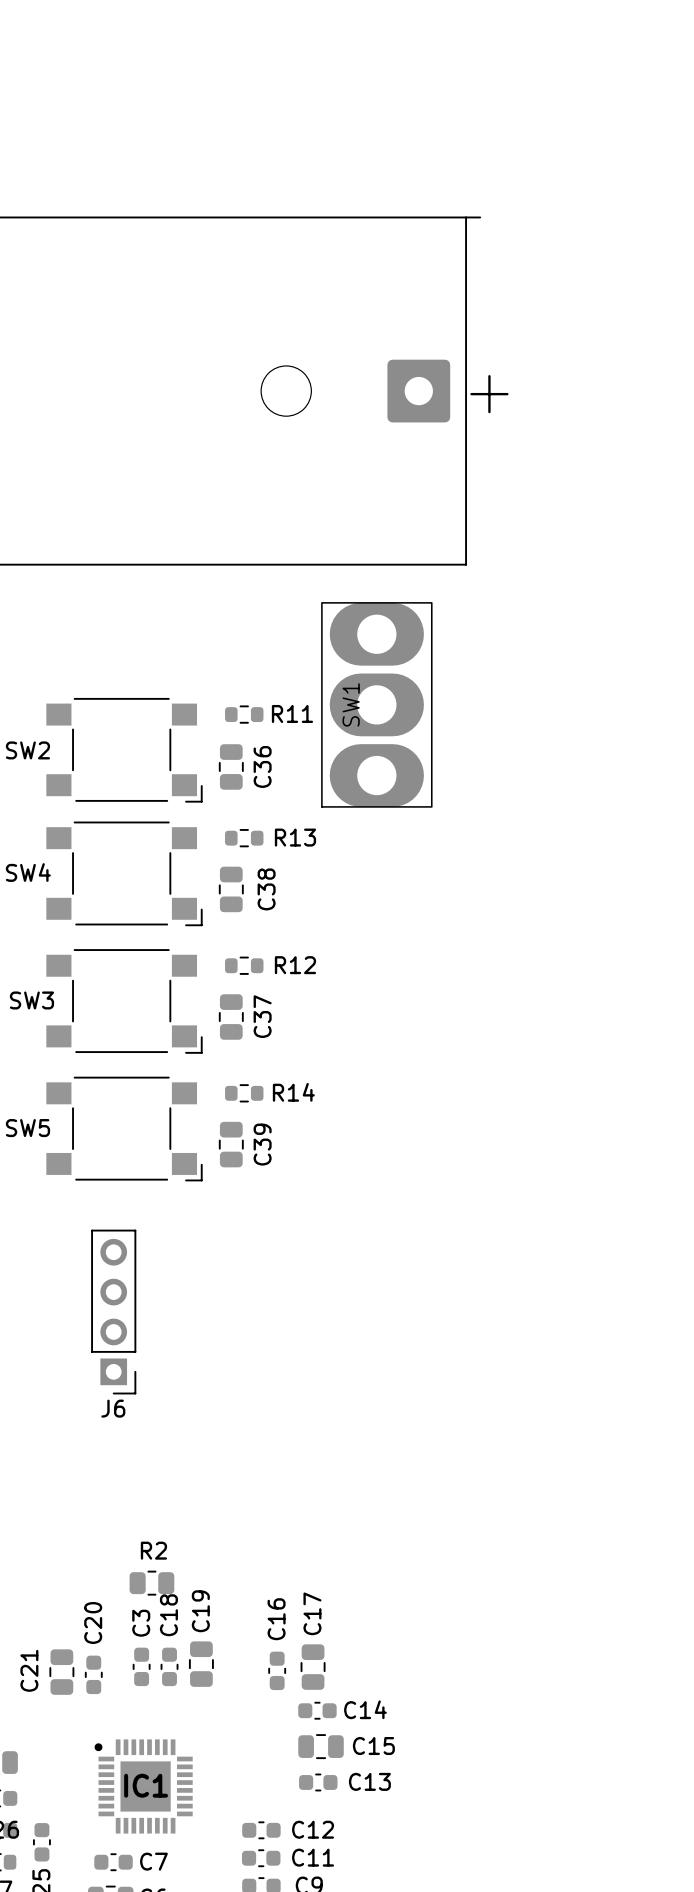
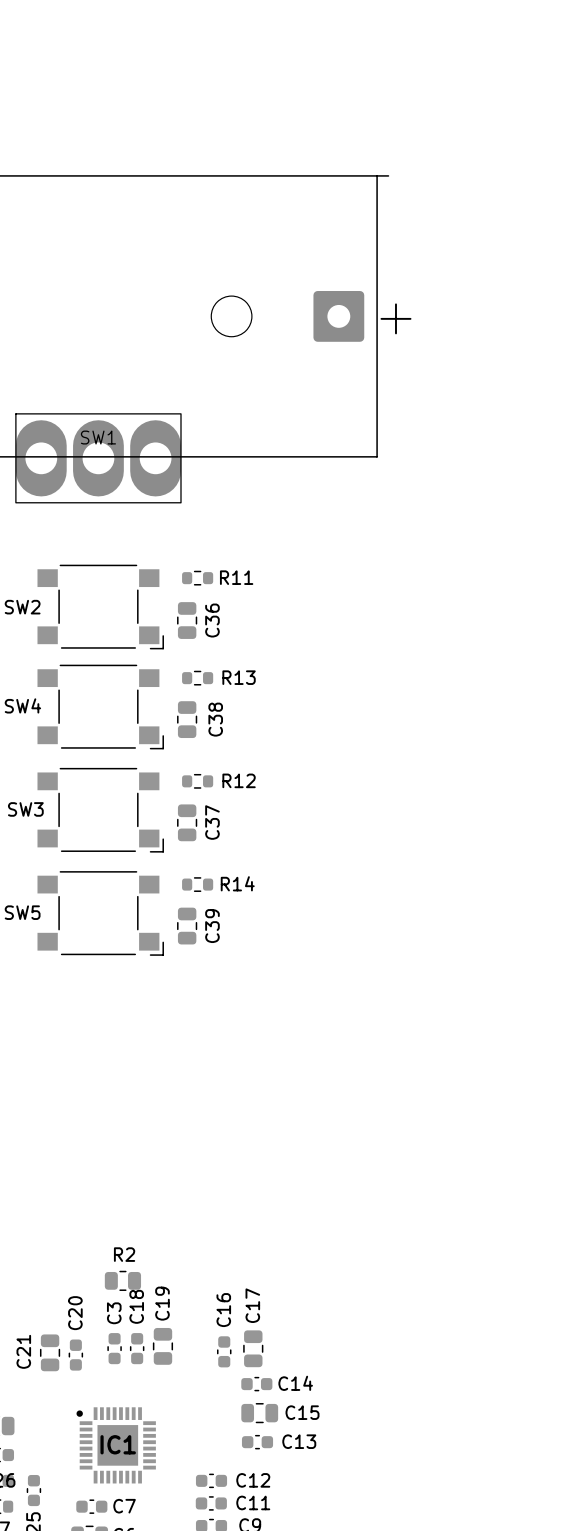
SW1 rotation: 0° (376, 704) -> 90° clockwise (98, 458)
SW1 position: (376, 704) -> (98, 458)
J6: (113, 1312) -> none

